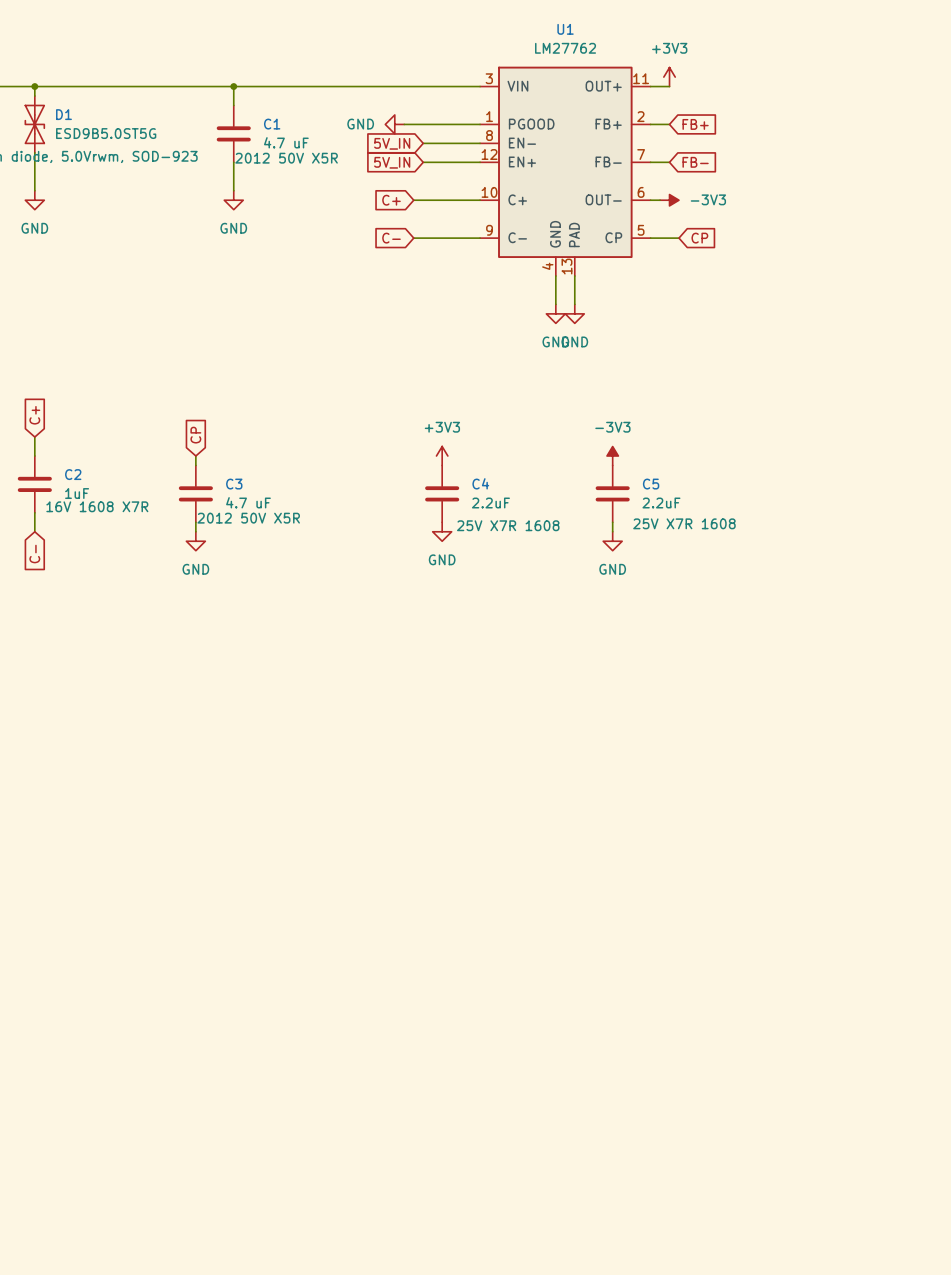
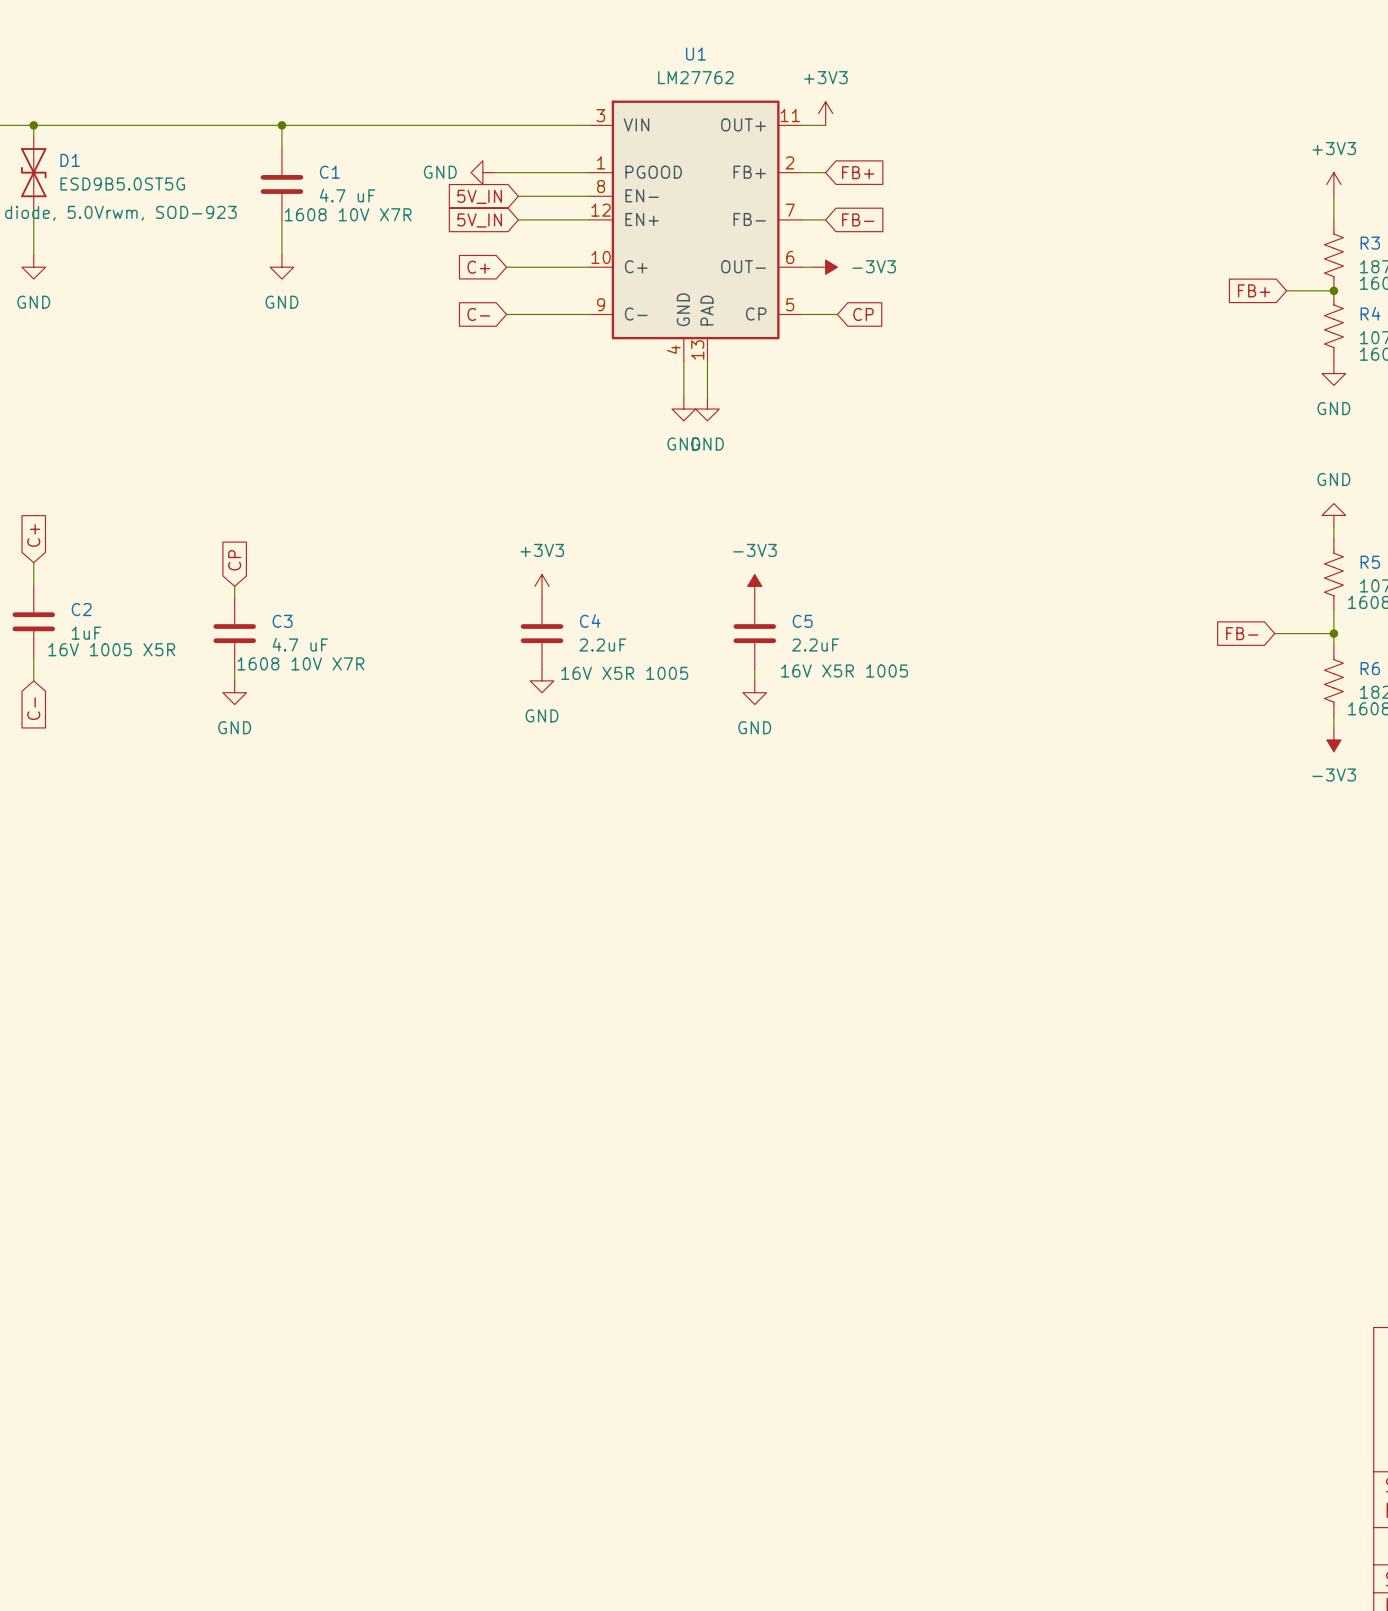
C1 text: 2012 50V X5R (286, 158) -> 1608 10V X7R (348, 214)
C2 text: 16V 1608 X7R (97, 506) -> 16V 1005 X5R (111, 649)
C3 text: 2012 50V X5R (248, 518) -> 1608 10V X7R (300, 663)
C5 text: 25V X7R 1608 (684, 523) -> 16V X5R 1005 (844, 670)
C4 text: 25V X7R 1608 (508, 525) -> 16V X5R 1005 (624, 673)

